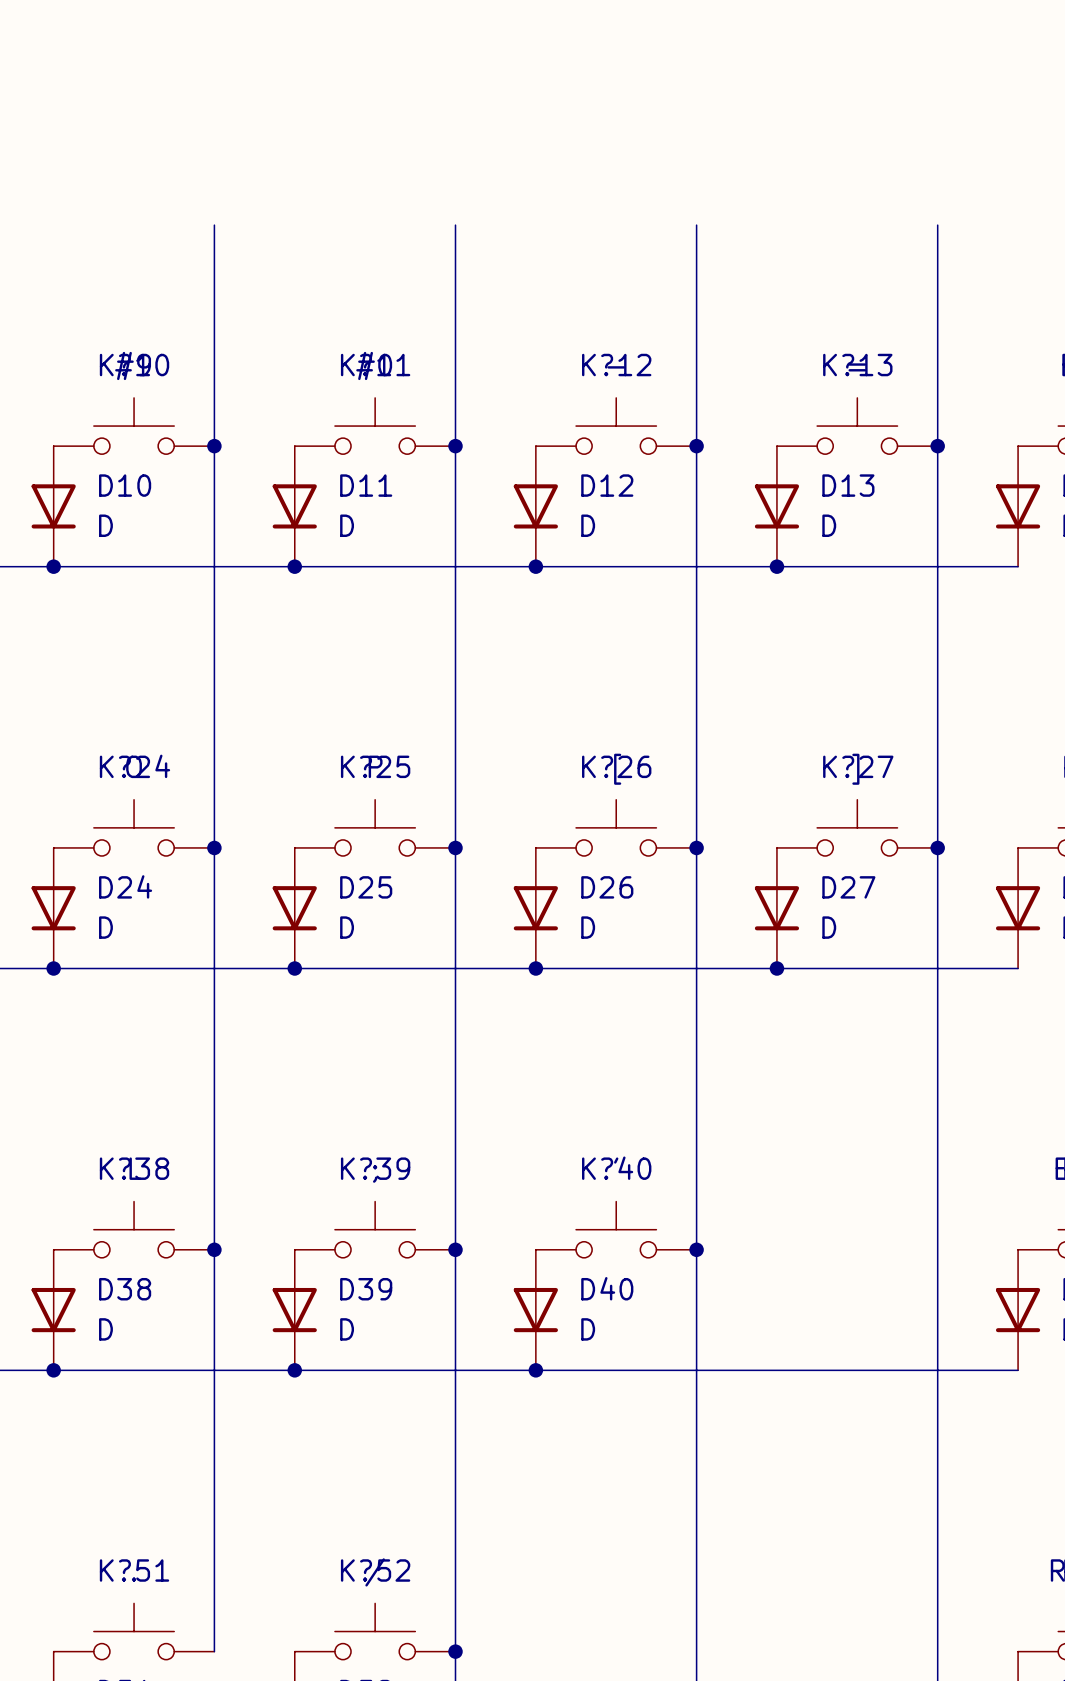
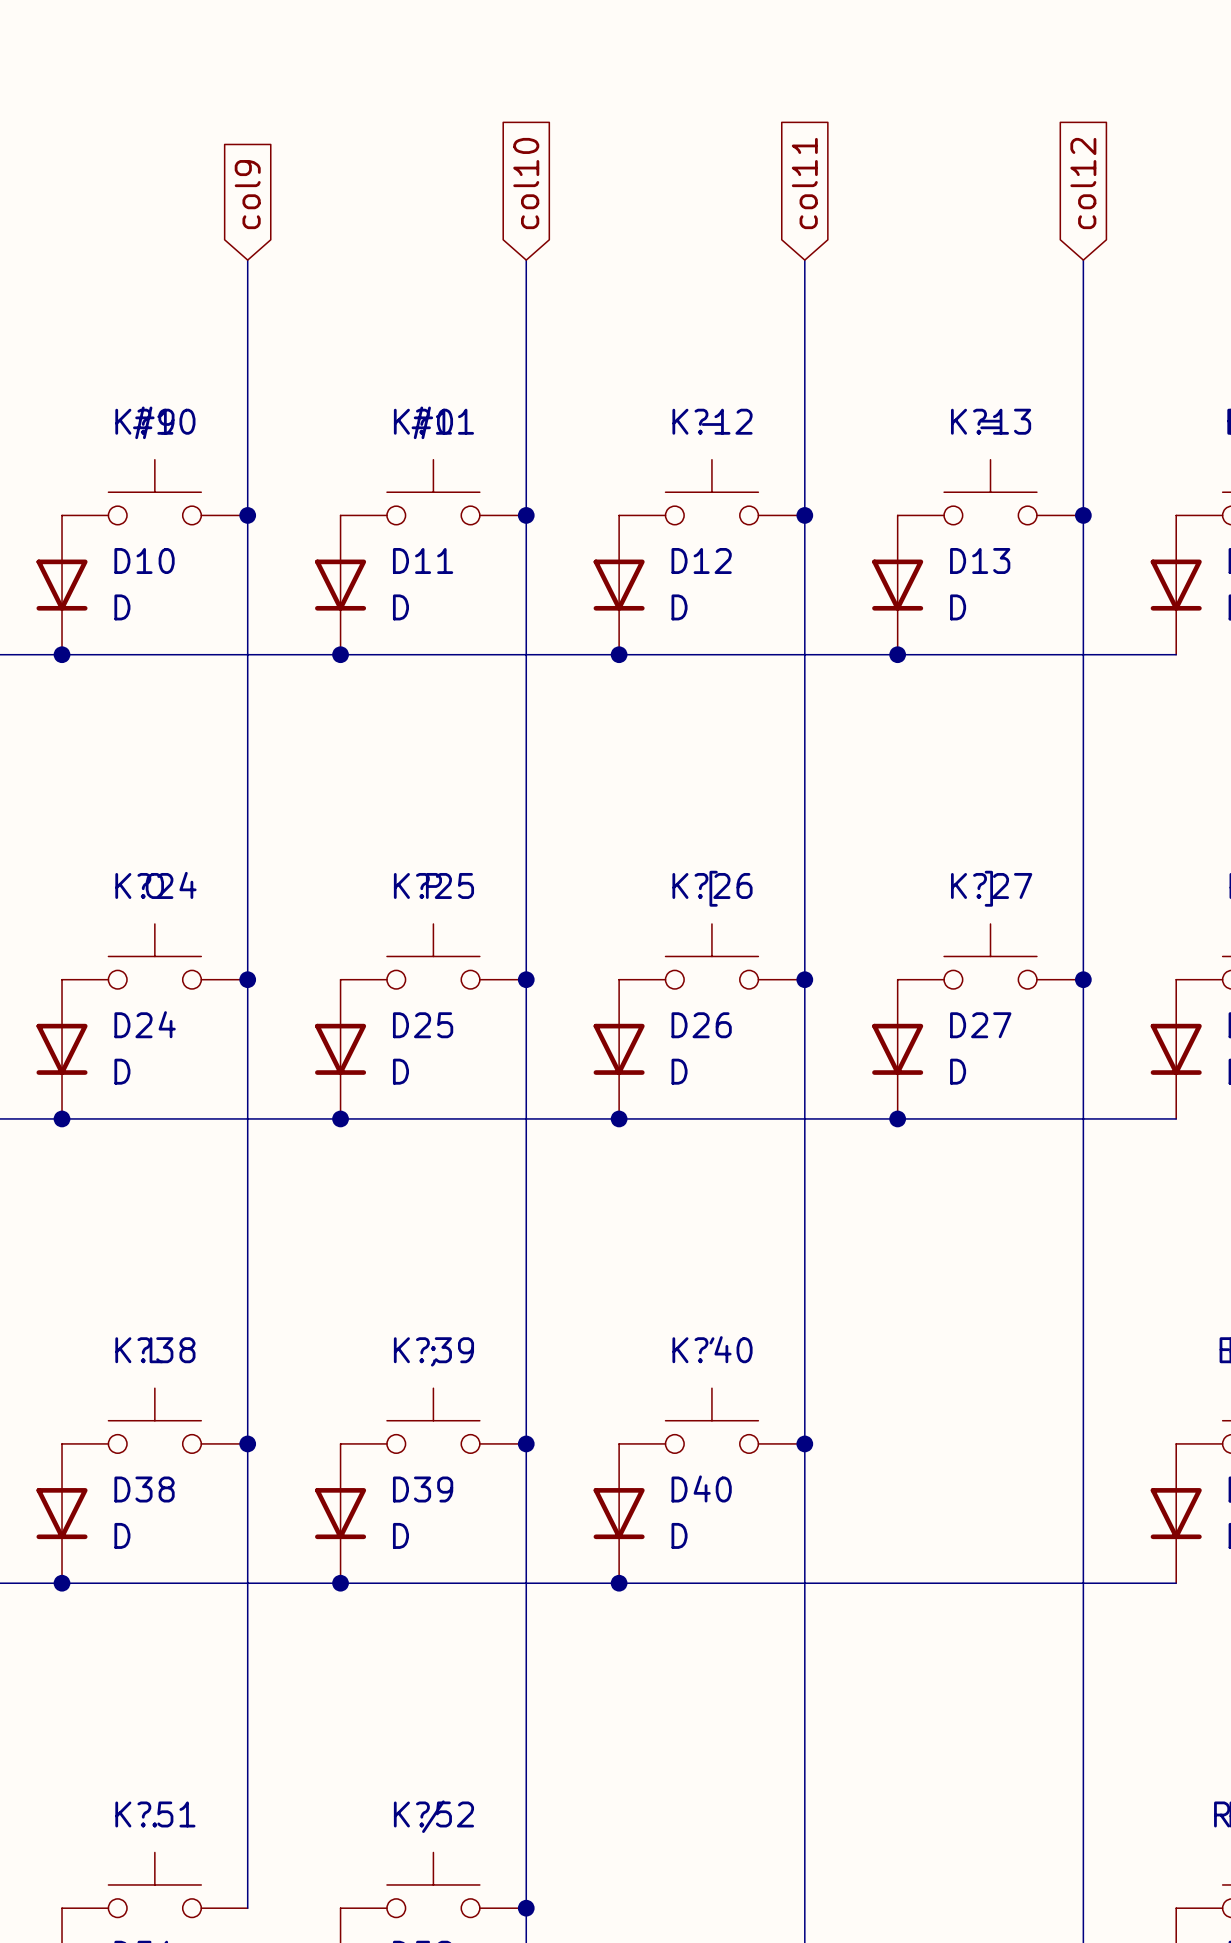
global label: none -> col10 (526, 183)
global label: none -> col11 (804, 183)
global label: none -> col12 (1083, 183)
global label: none -> col9 (247, 194)

